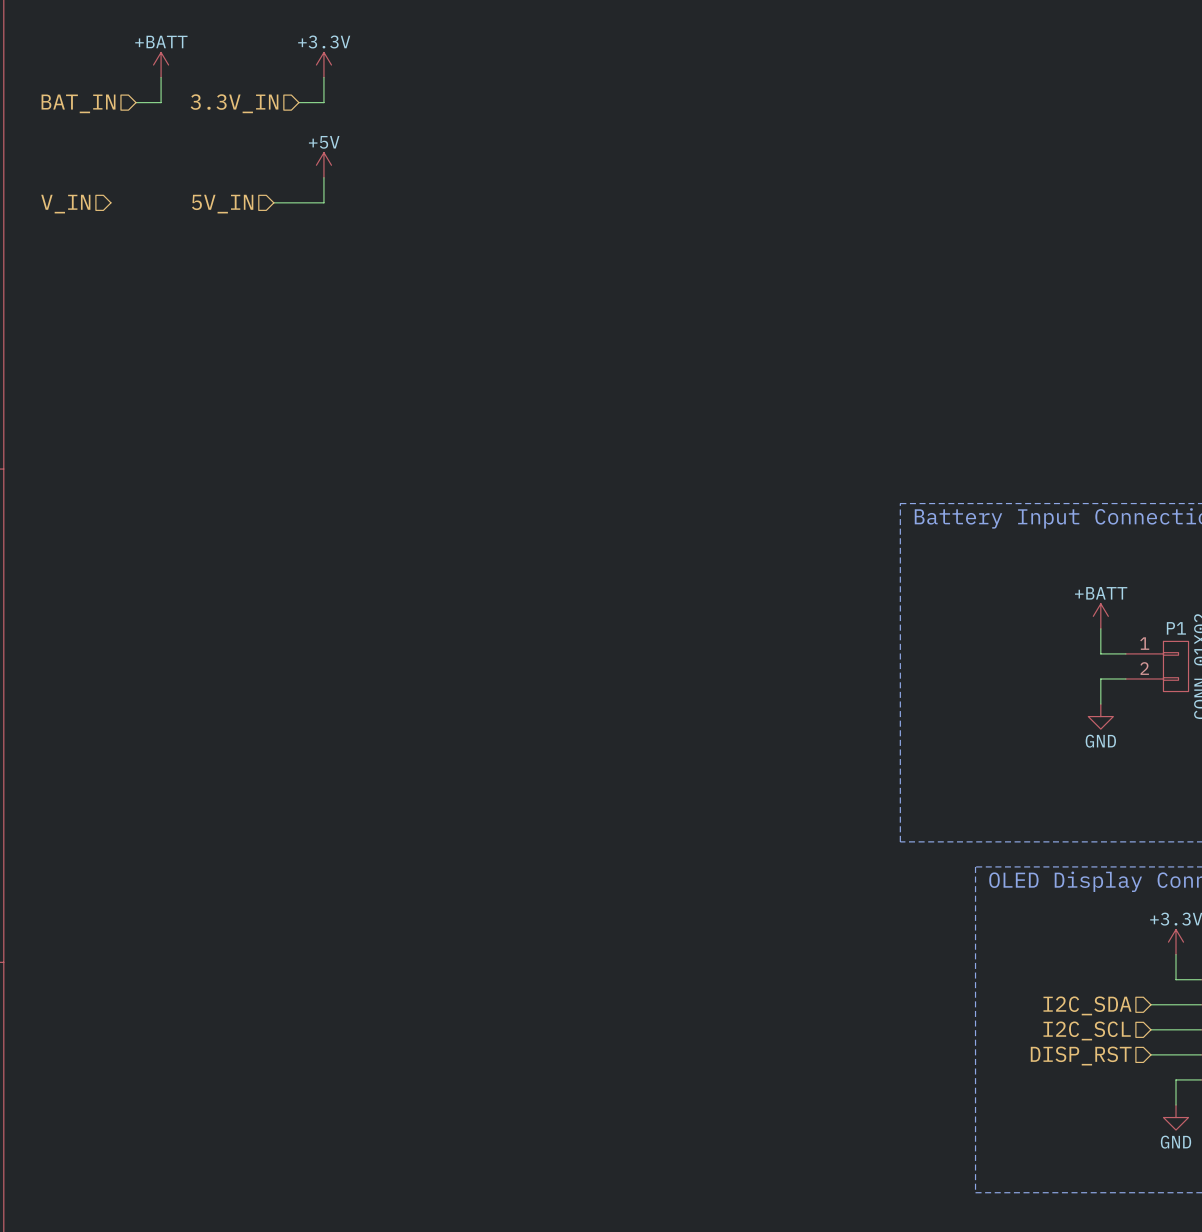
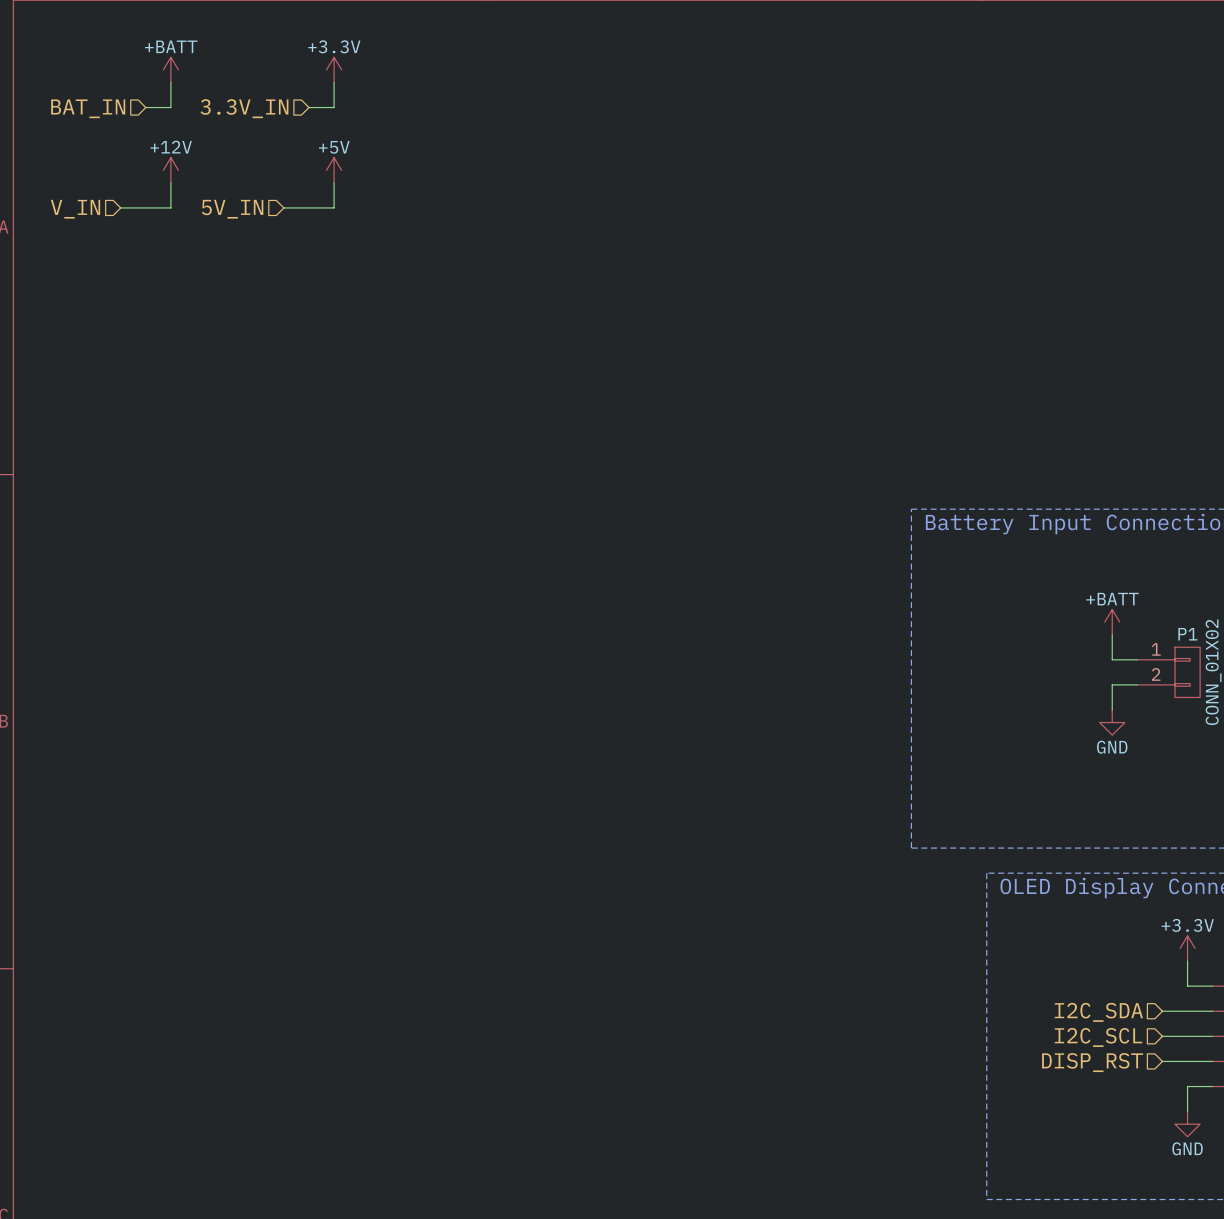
power symbol: none -> +12V (170, 170)
wire: none -> (170, 182) (170, 207) (120, 207)

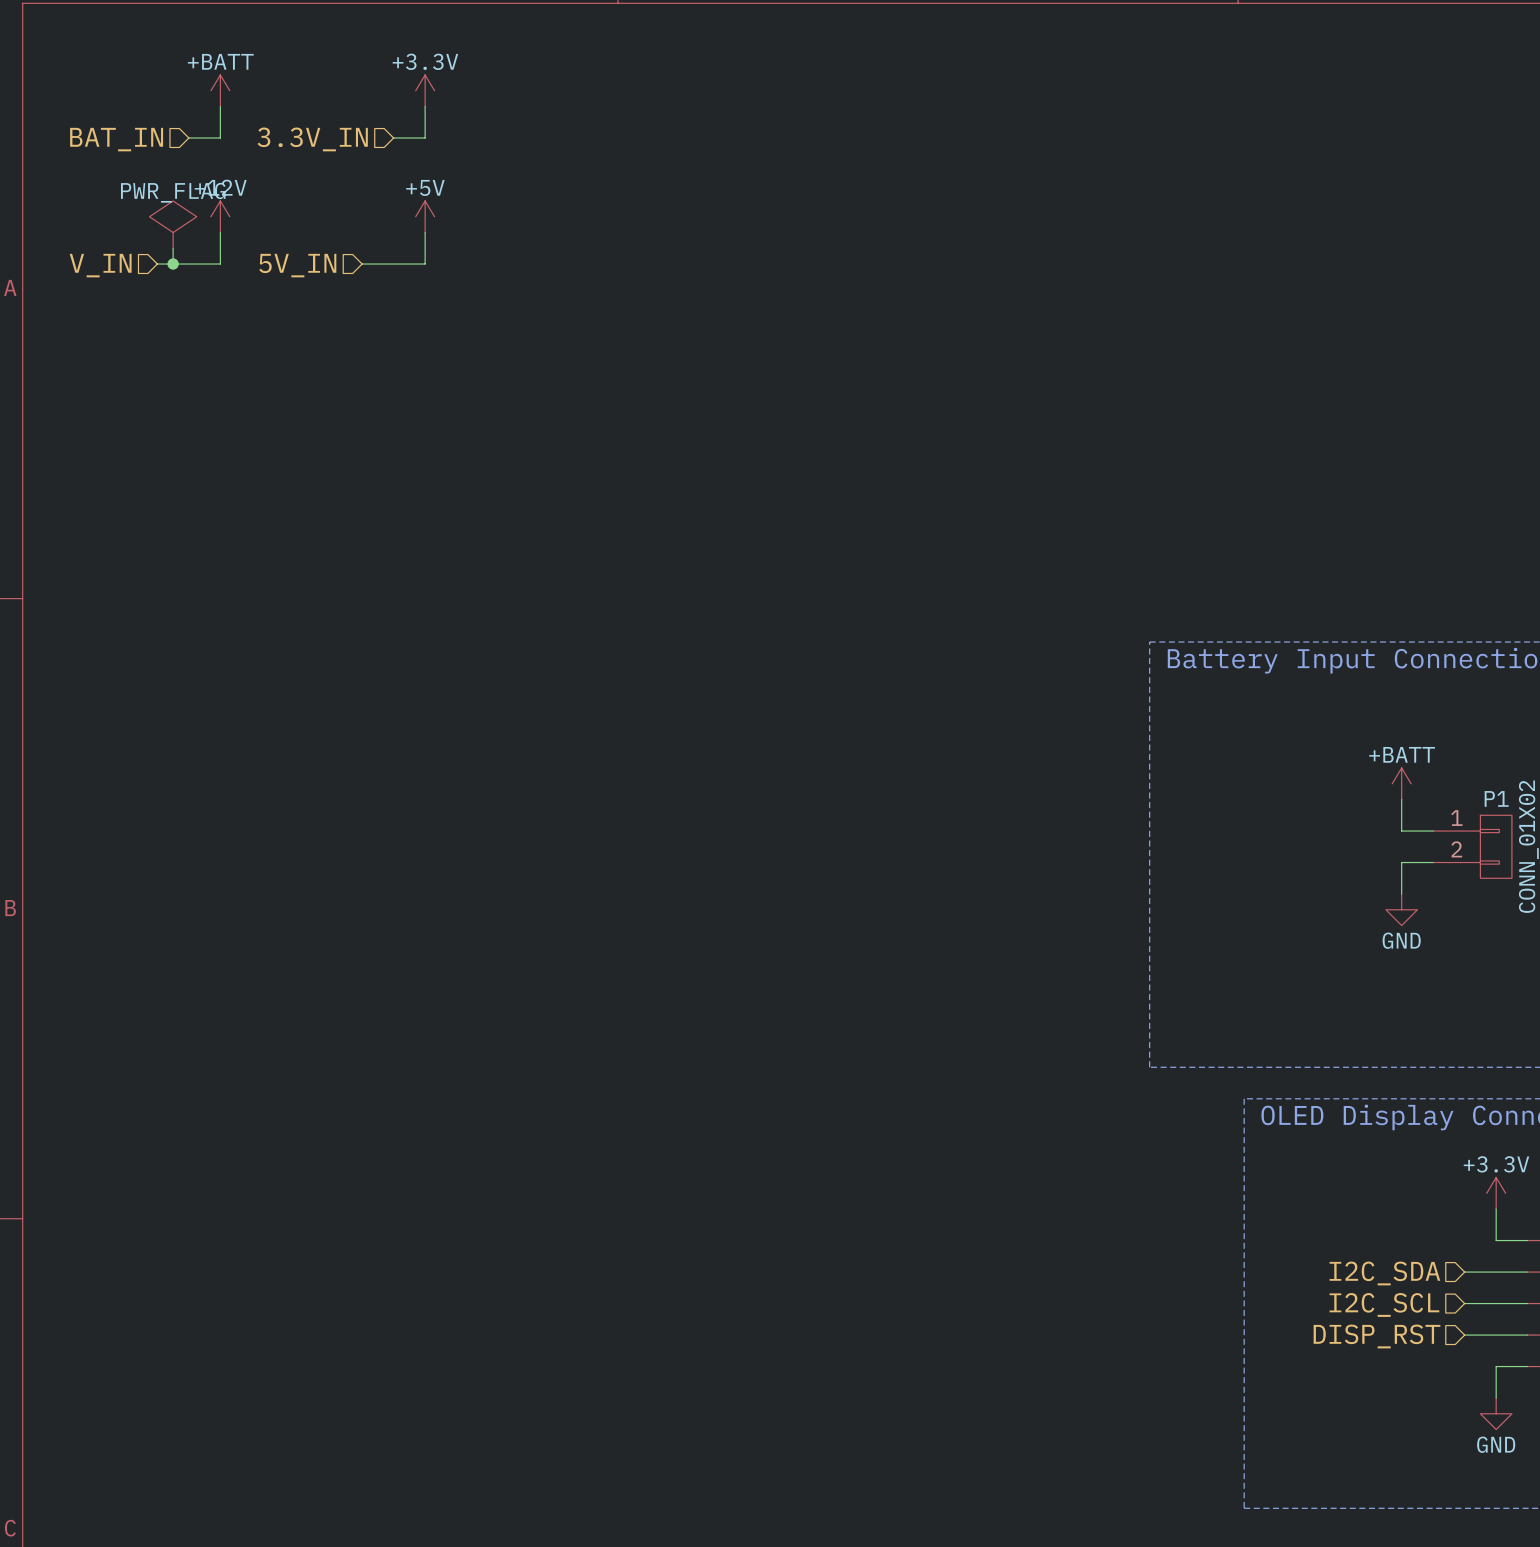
power symbol: none -> PWR_FLAG (173, 224)
wire: none -> (173, 248) (173, 264)
junction: none -> (173, 264)

